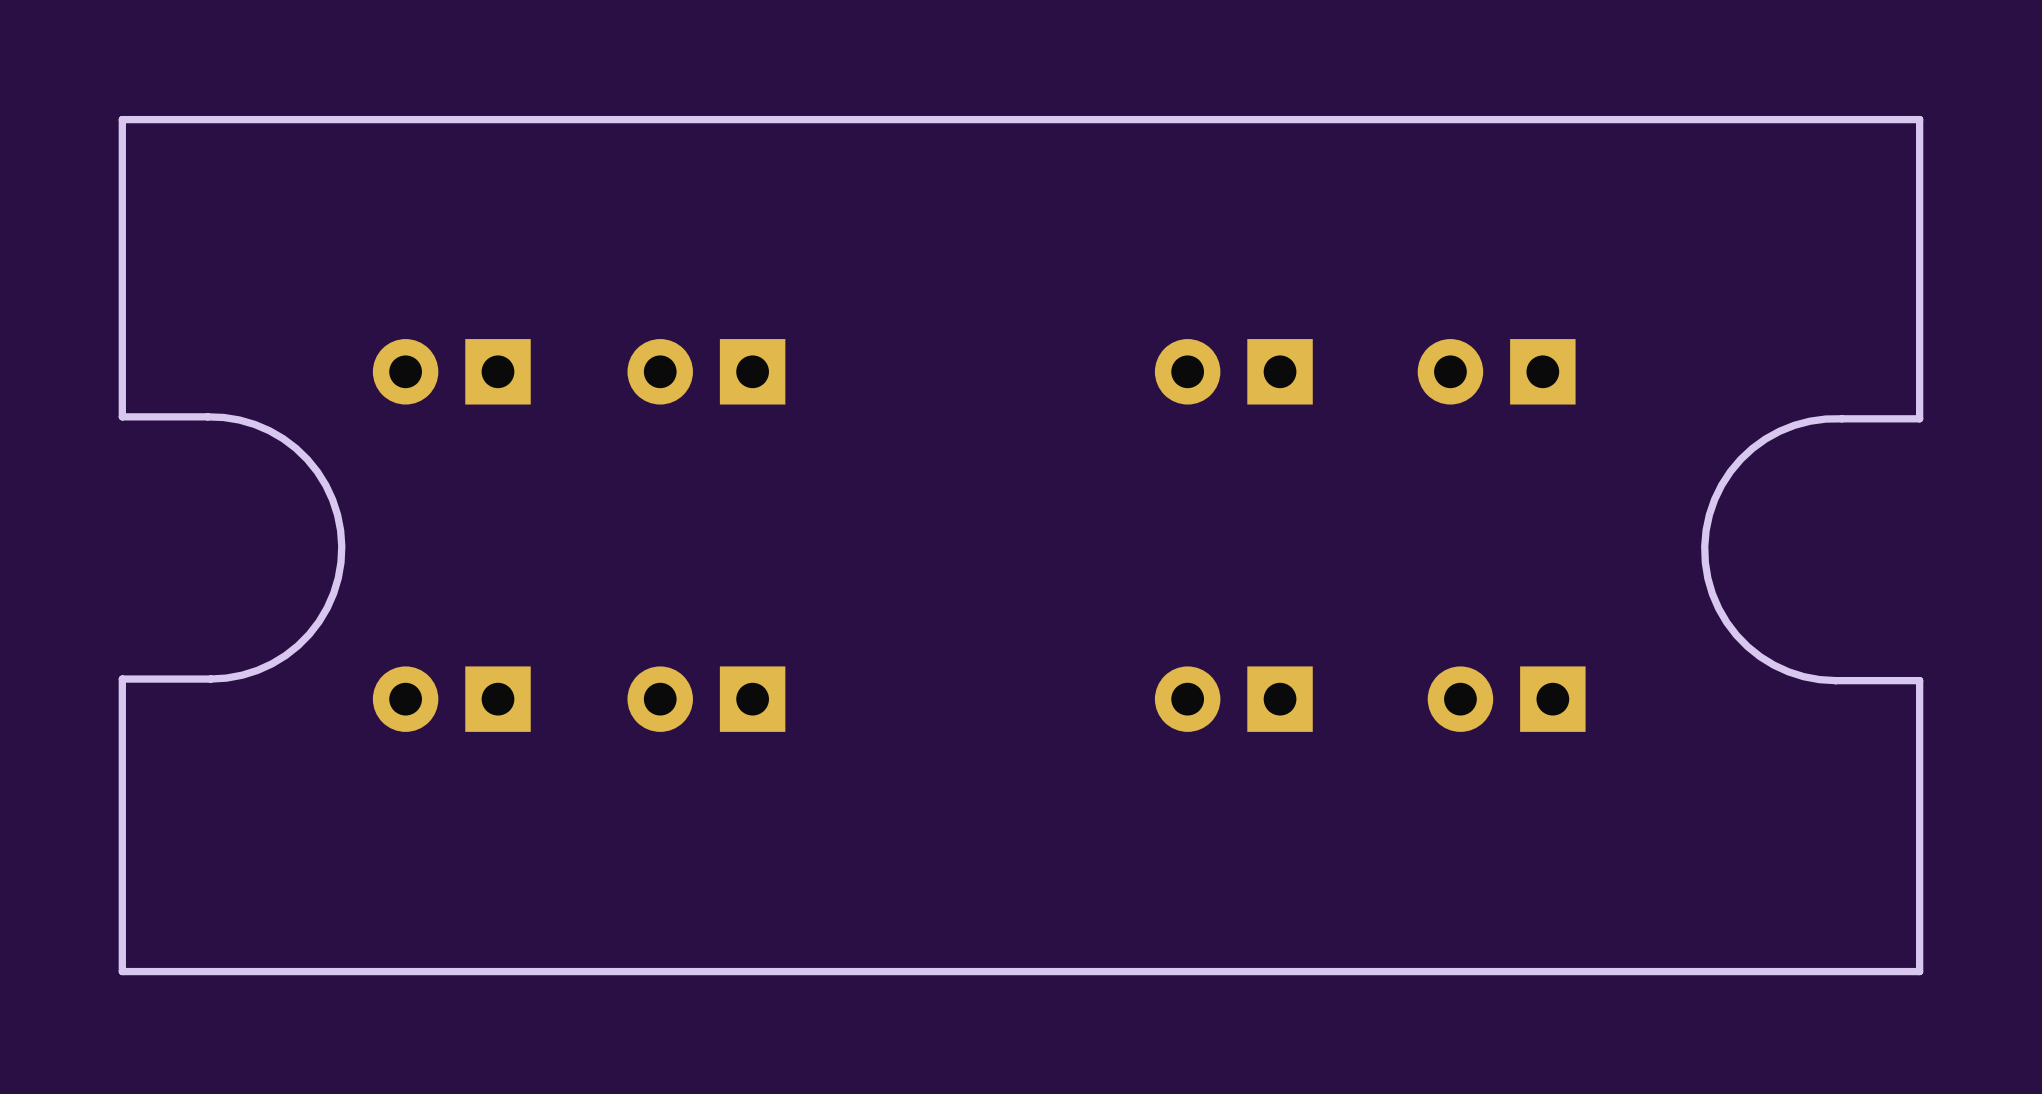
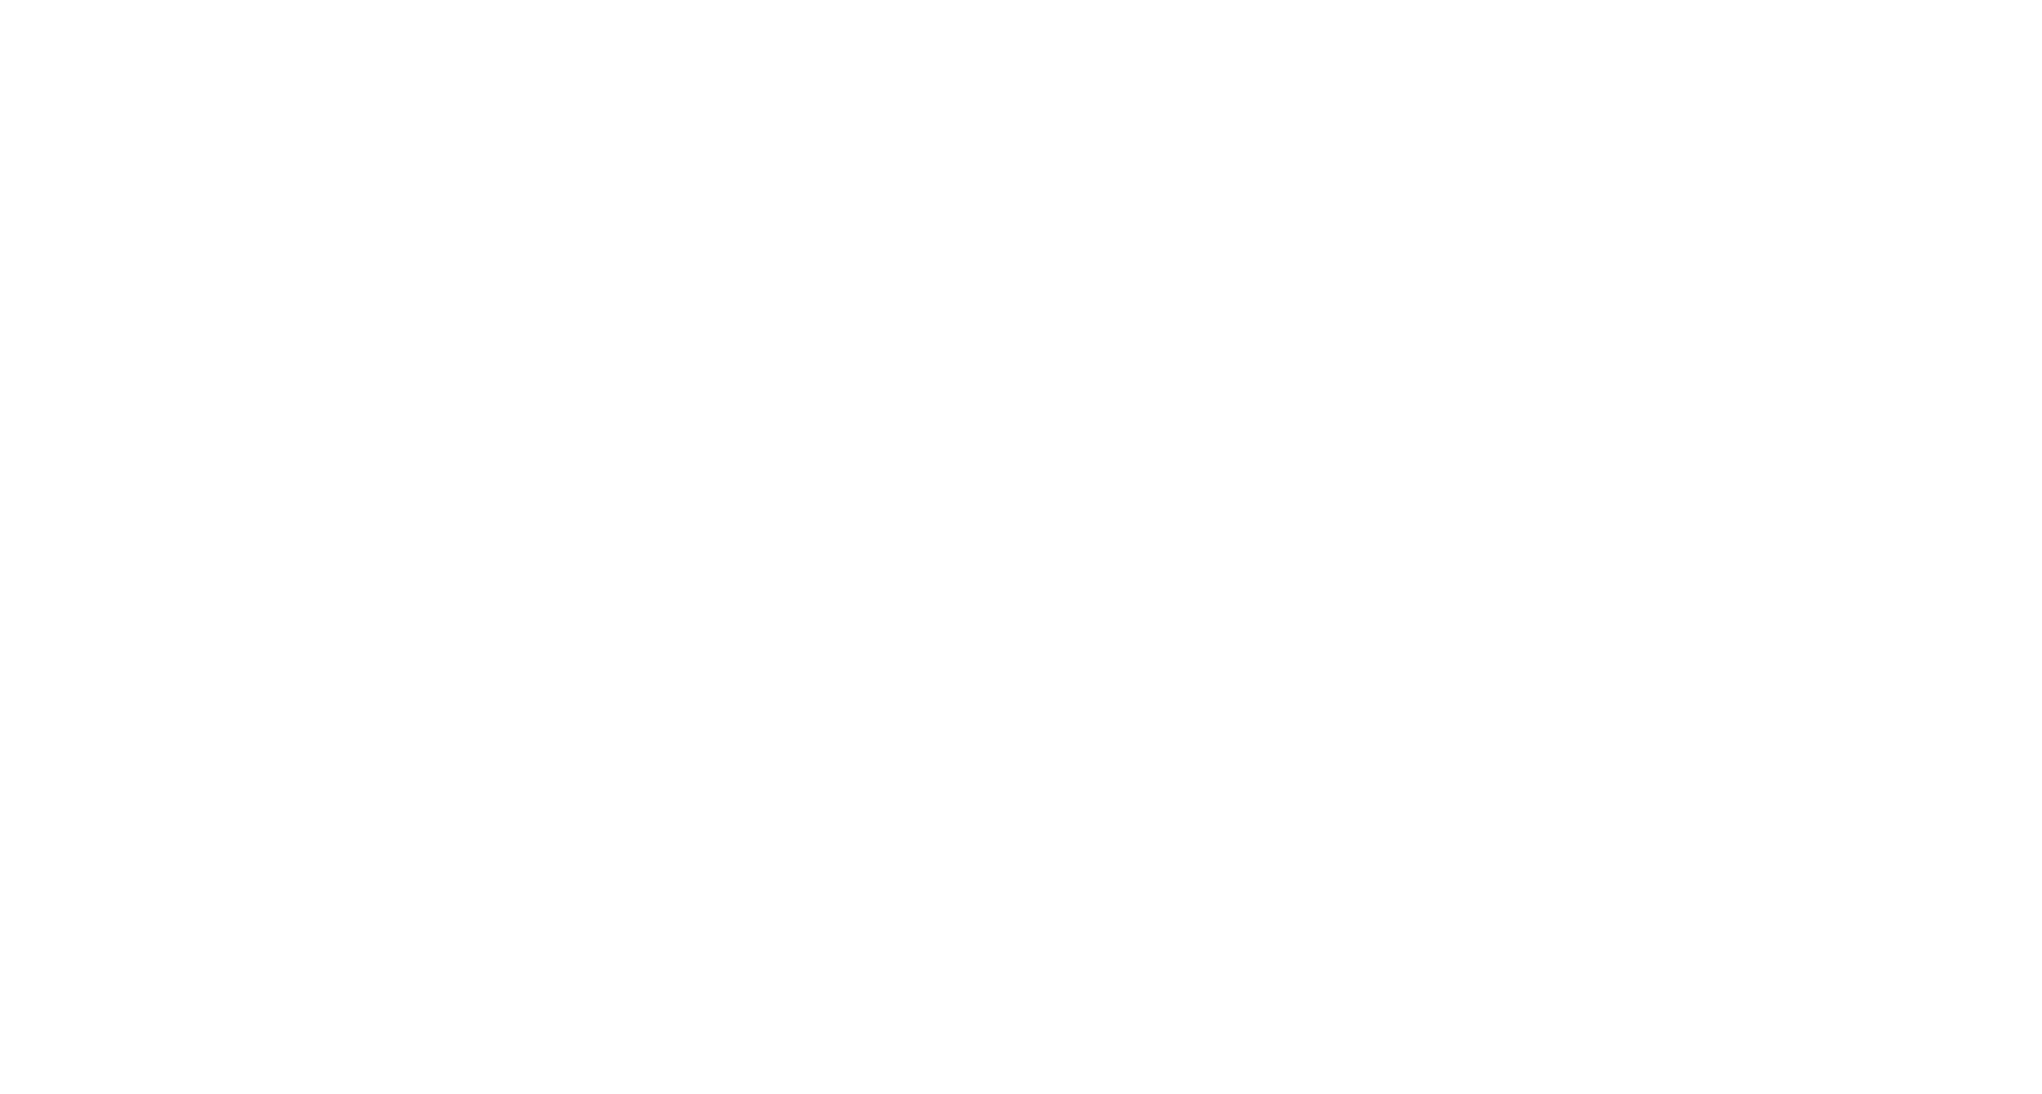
board edge: (1919, 119) (122, 119) (122, 416) (223, 417) (254, 424) (283, 438) (307, 459) (325, 485) (337, 514) (341, 546) (338, 578) (327, 607) (309, 634) (298, 645) (272, 663) (257, 670) (226, 678) (122, 679) (122, 971) (1919, 971) (1919, 680) (1819, 679) (1788, 671) (1760, 656) (1736, 635) (1718, 608) (1707, 578) (1704, 546) (1709, 514) (1721, 485) (1740, 459) (1765, 439) (1794, 425) (1825, 419) (1919, 418) (1919, 119) -> none
part: (451, 371) -> none
part: (706, 371) -> none
part: (1233, 371) -> none
part: (1496, 371) -> none
part: (451, 699) -> none
part: (706, 699) -> none
part: (1233, 699) -> none
part: (1506, 699) -> none

